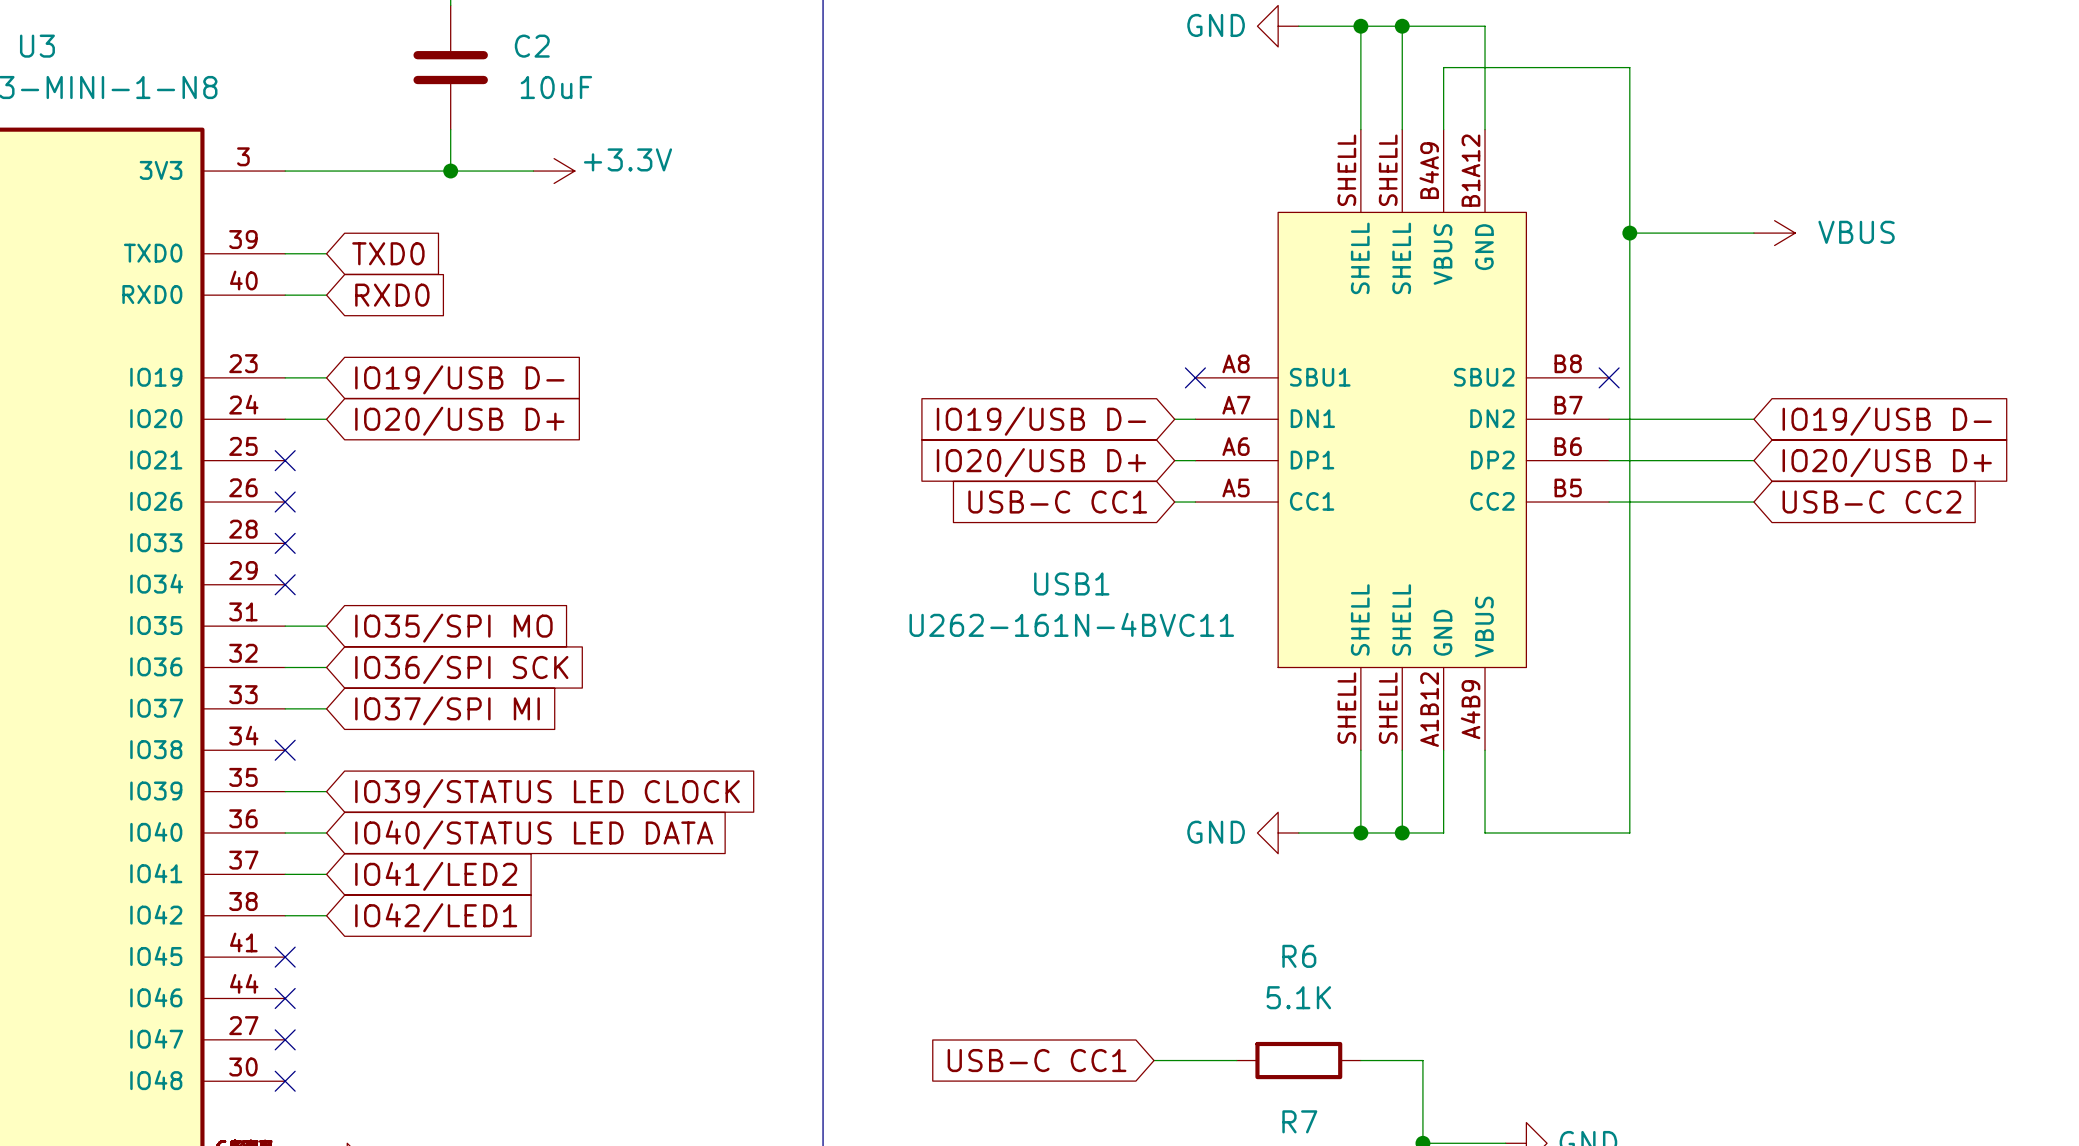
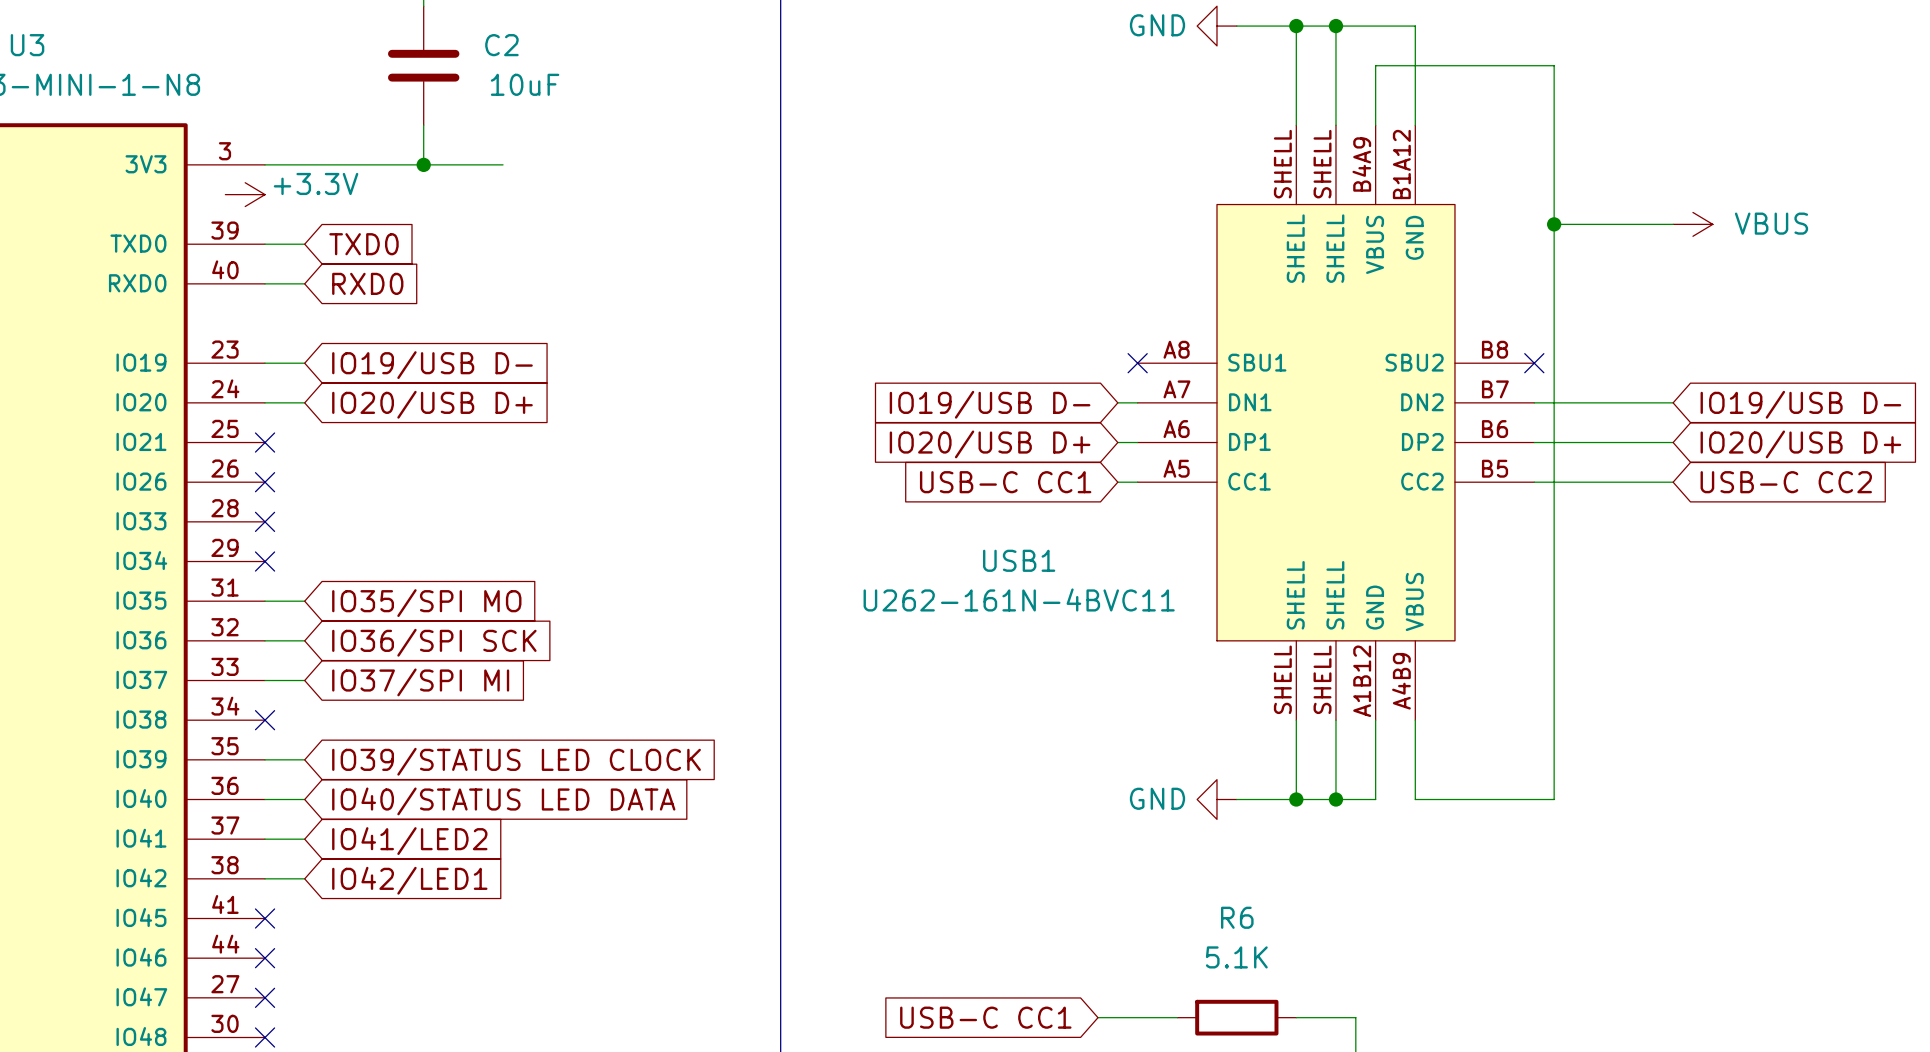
power symbol position: +3.3V (554, 171) -> +3.3V (245, 194)

